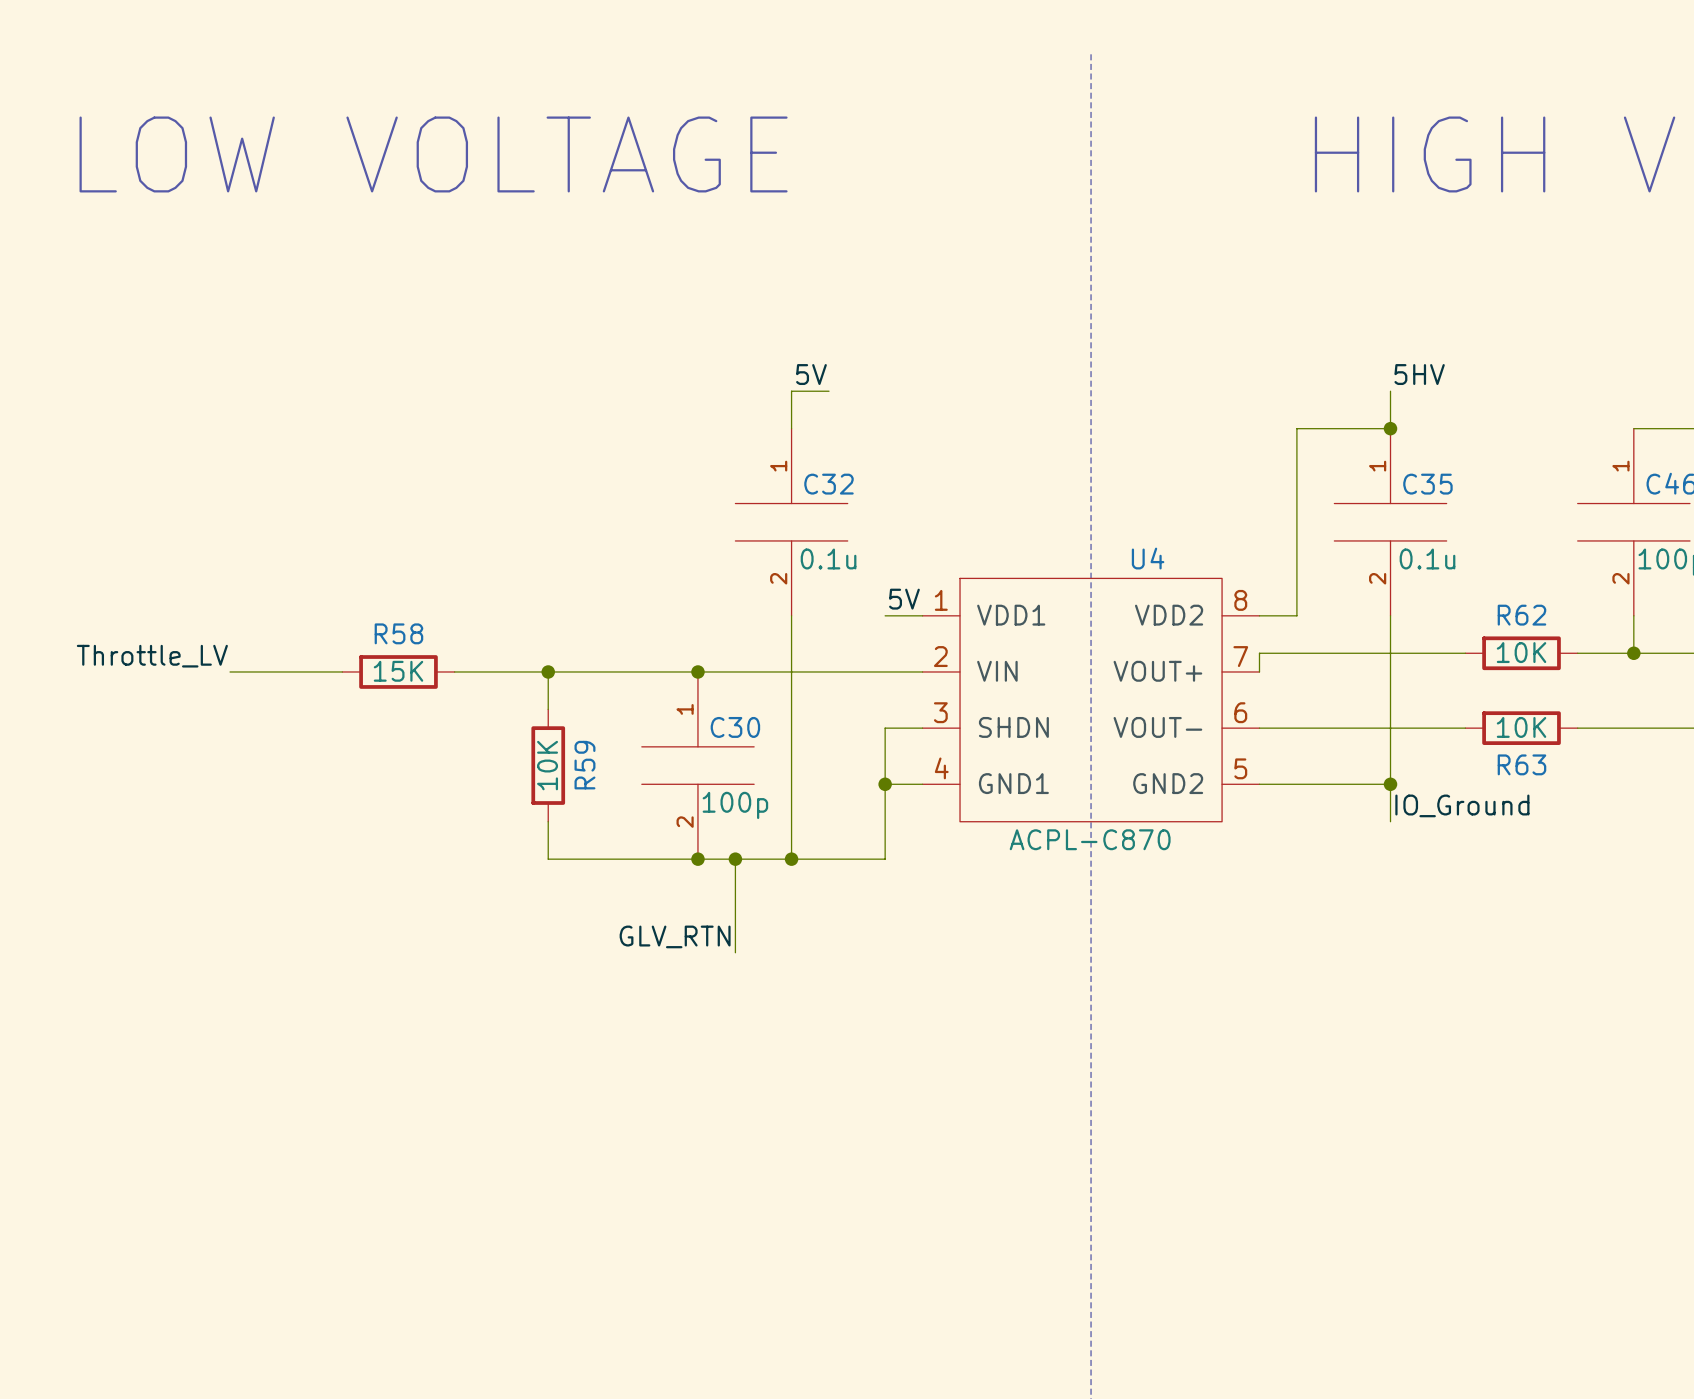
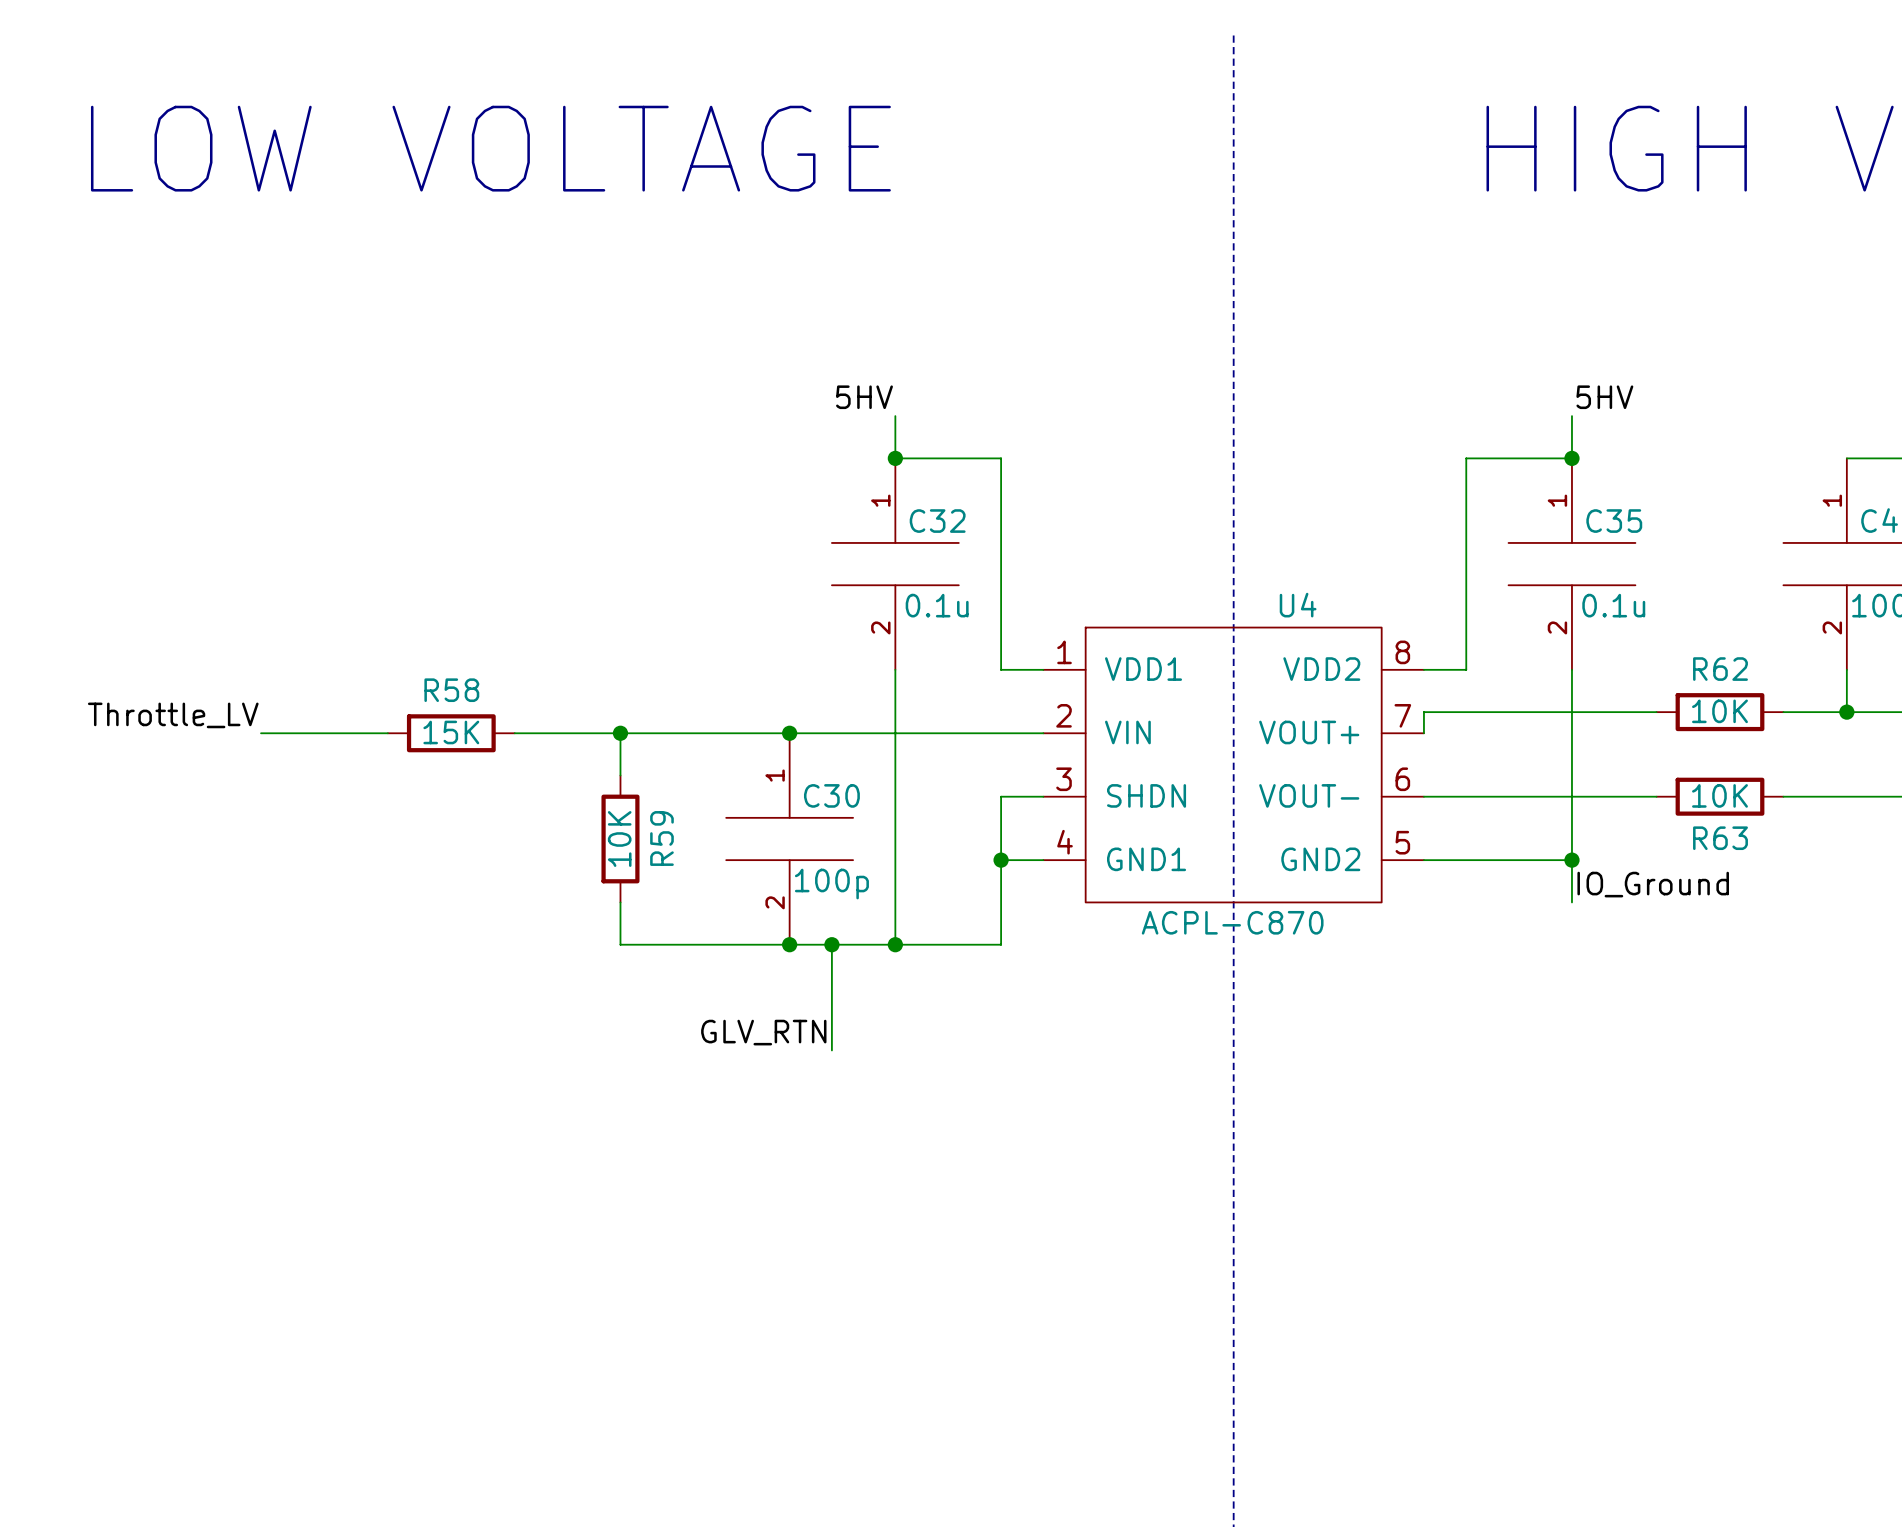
label: 5V (811, 374) -> 5HV (864, 397)
wire: (791, 391) (828, 391) -> none
wire: none -> (895, 458) (1001, 458) (1001, 669)
junction: none -> (895, 458)
label: 5V (904, 599) -> none

